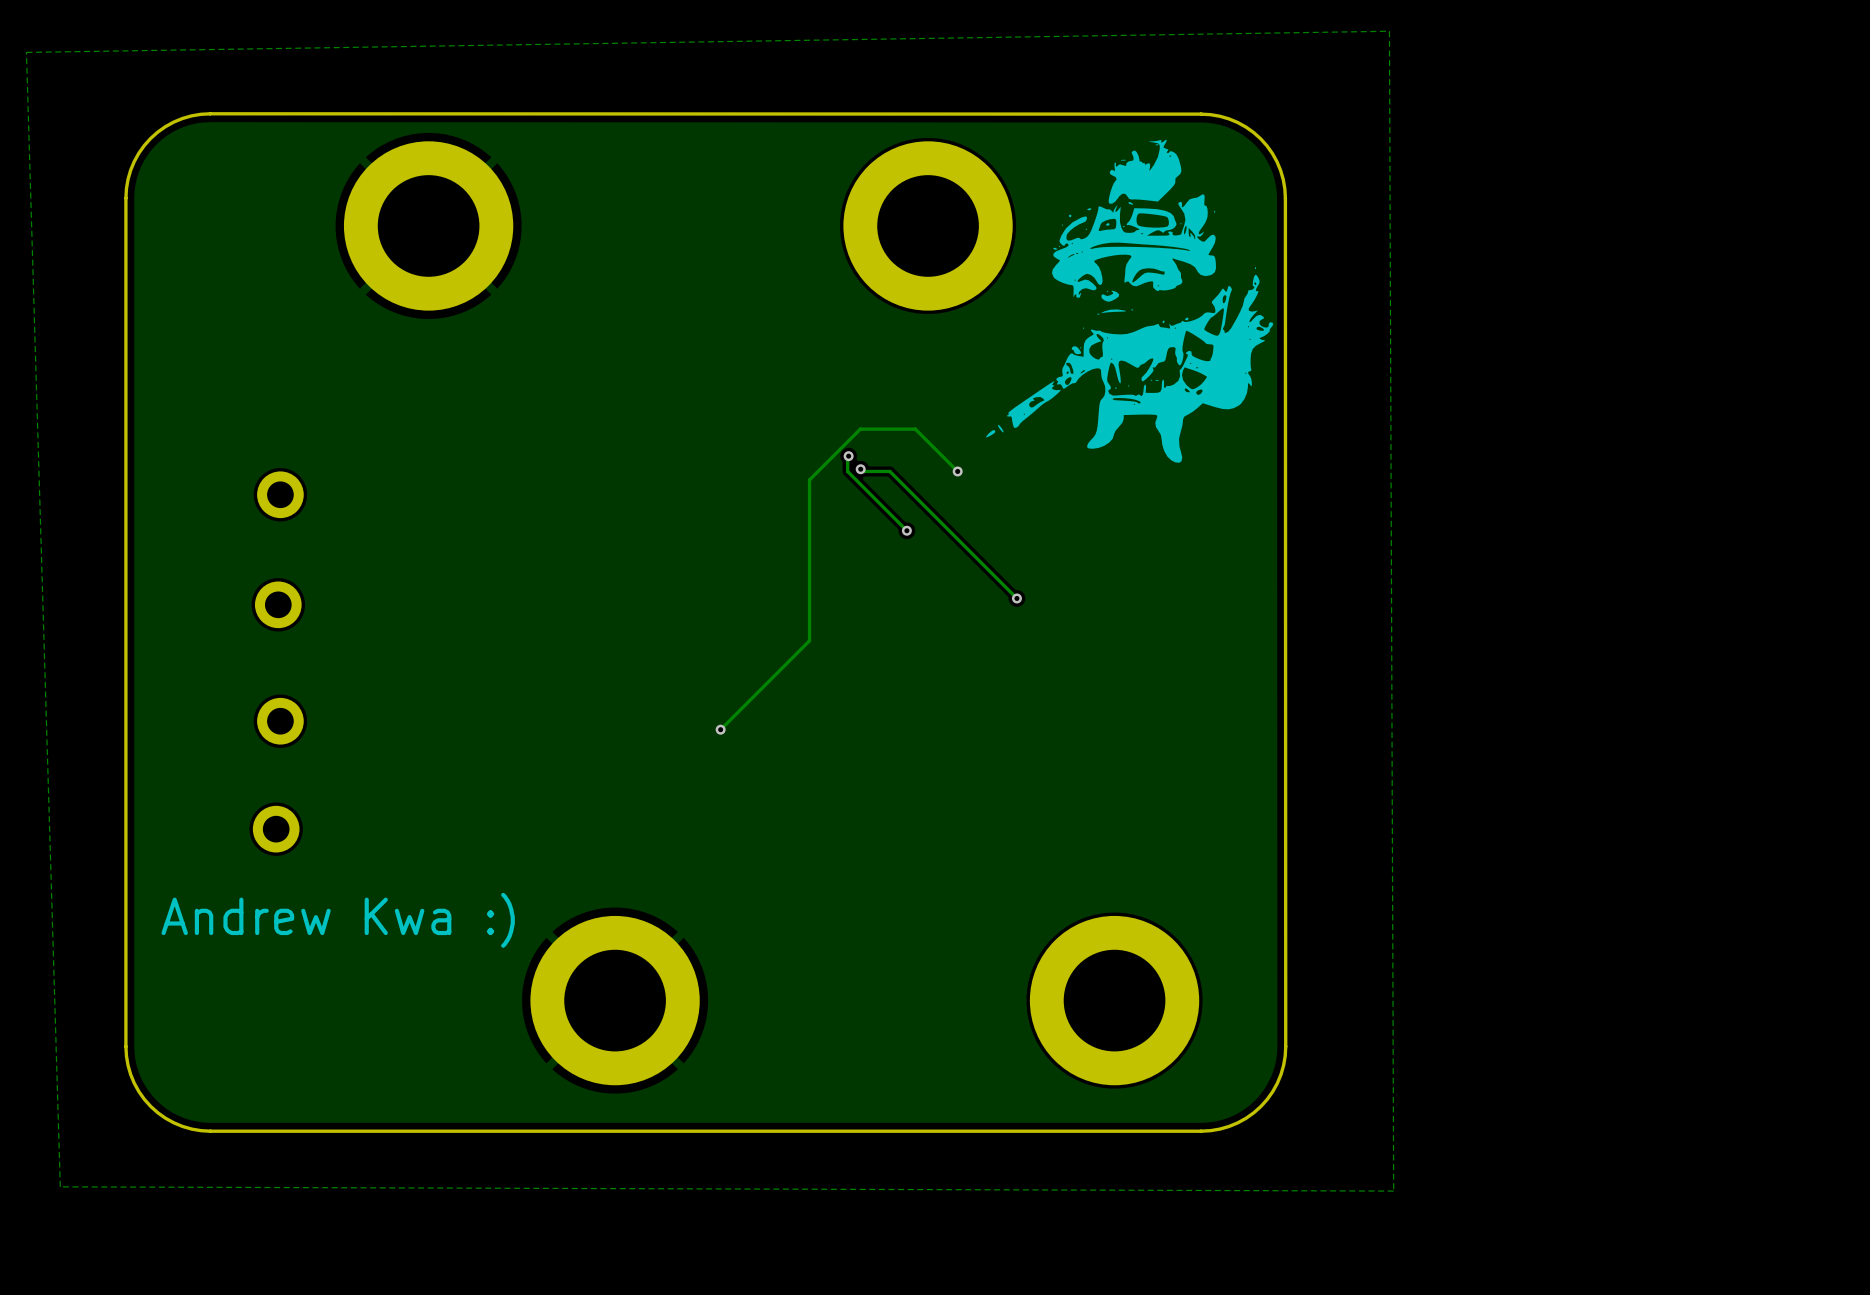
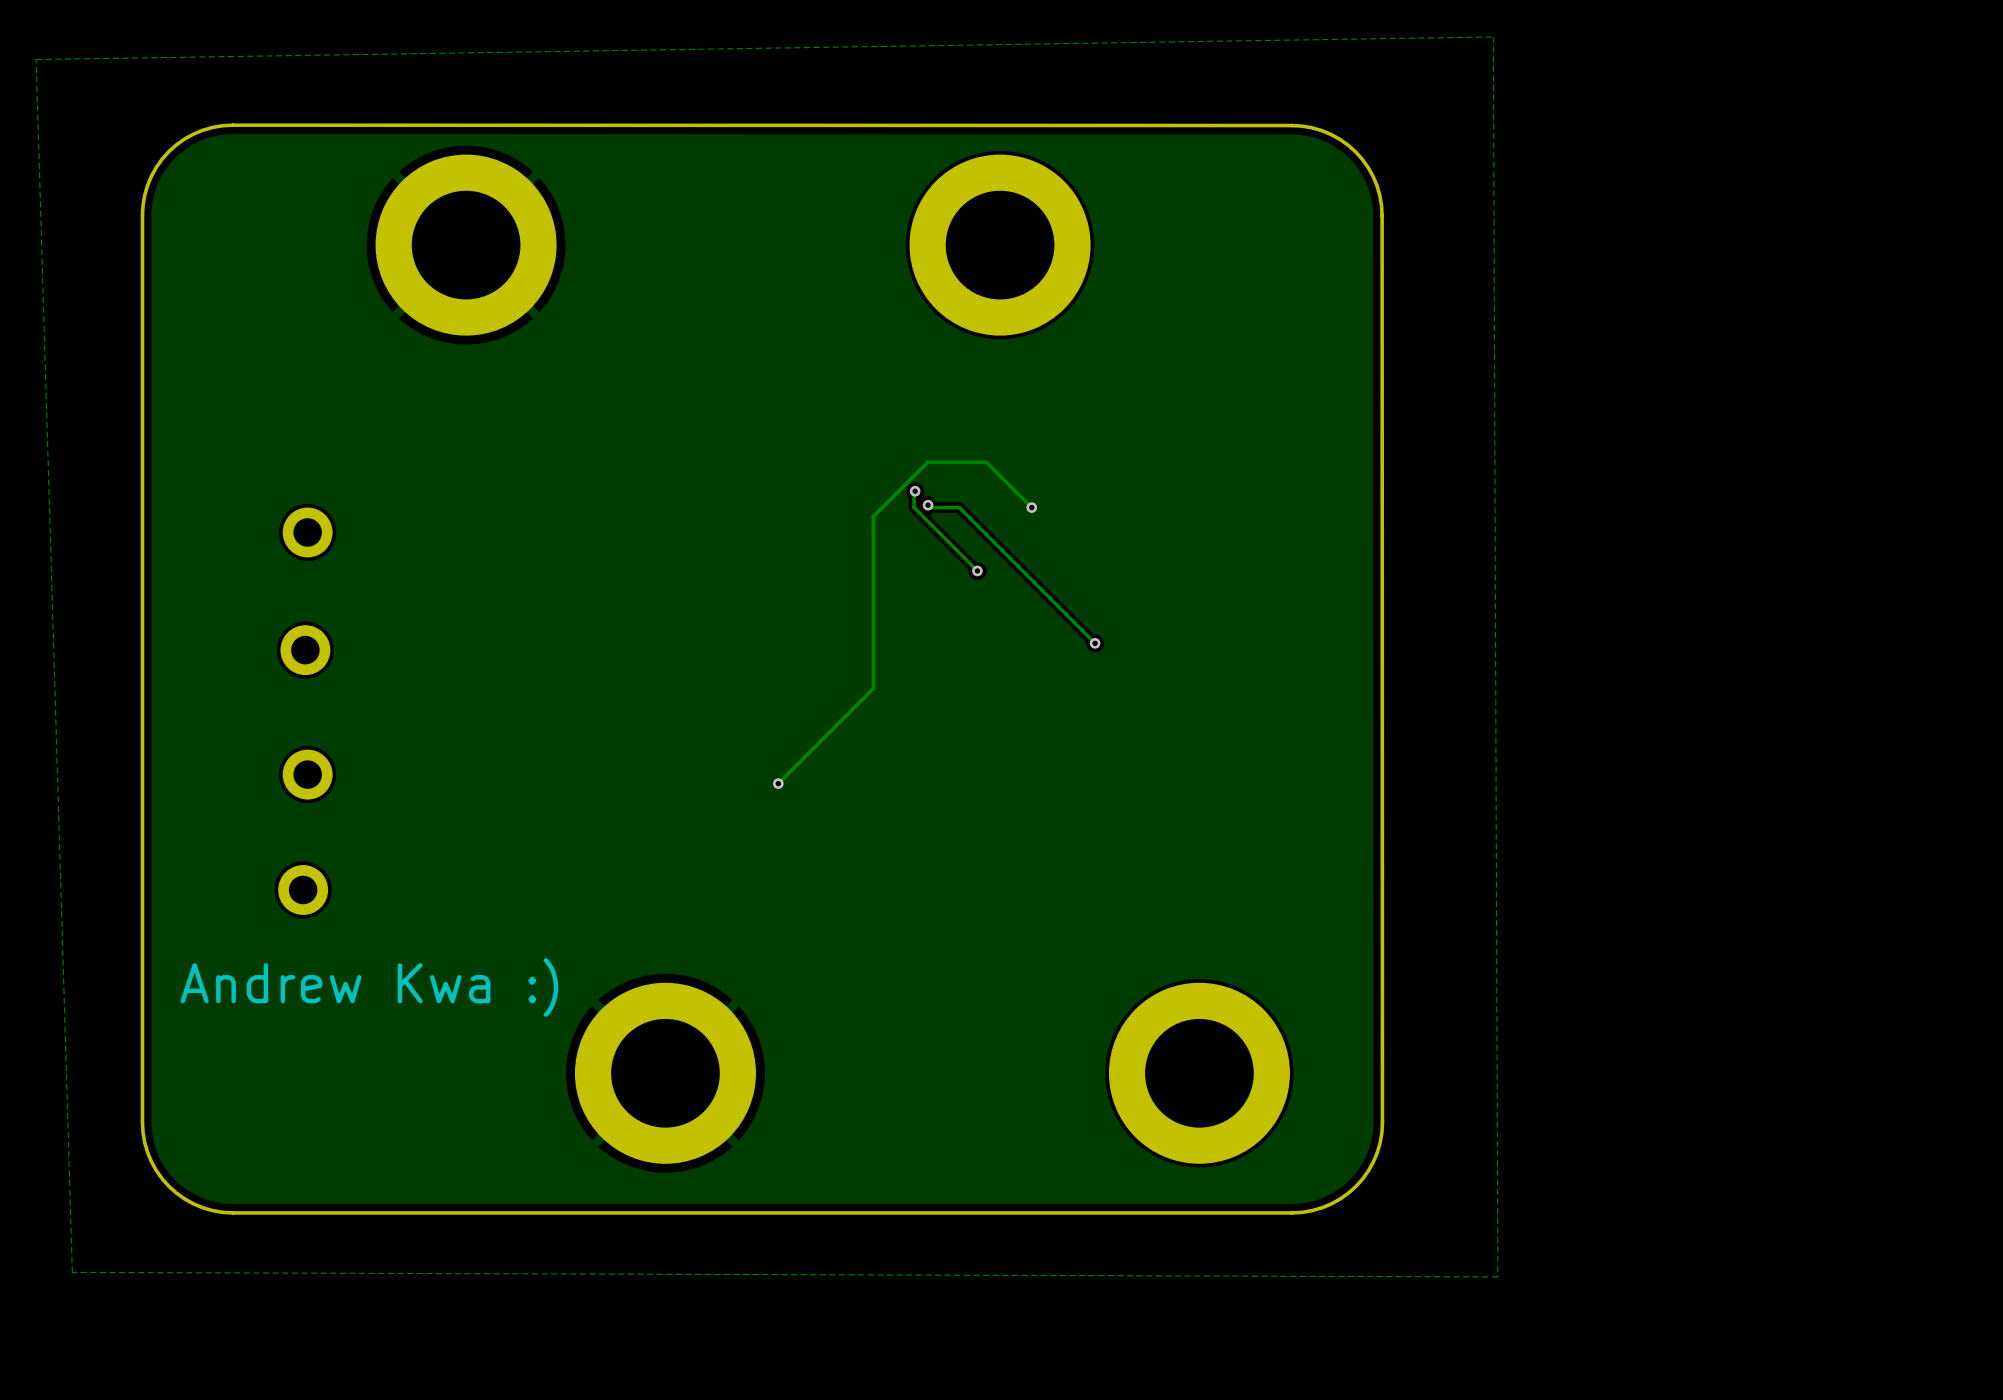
drawing: [986, 139, 1274, 463] -> none

